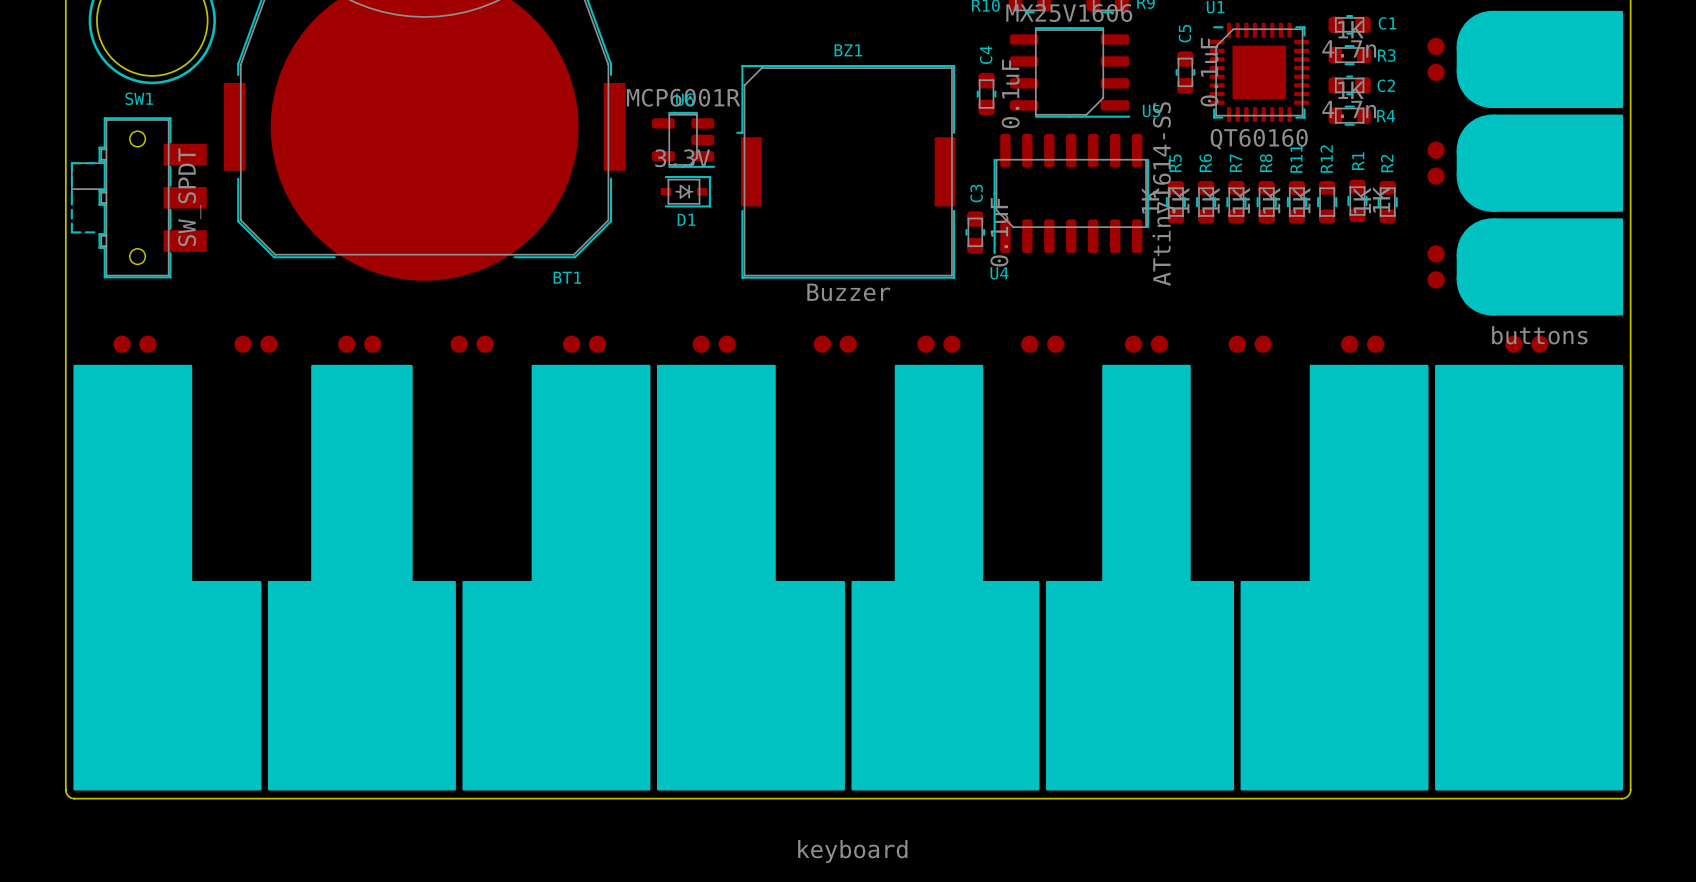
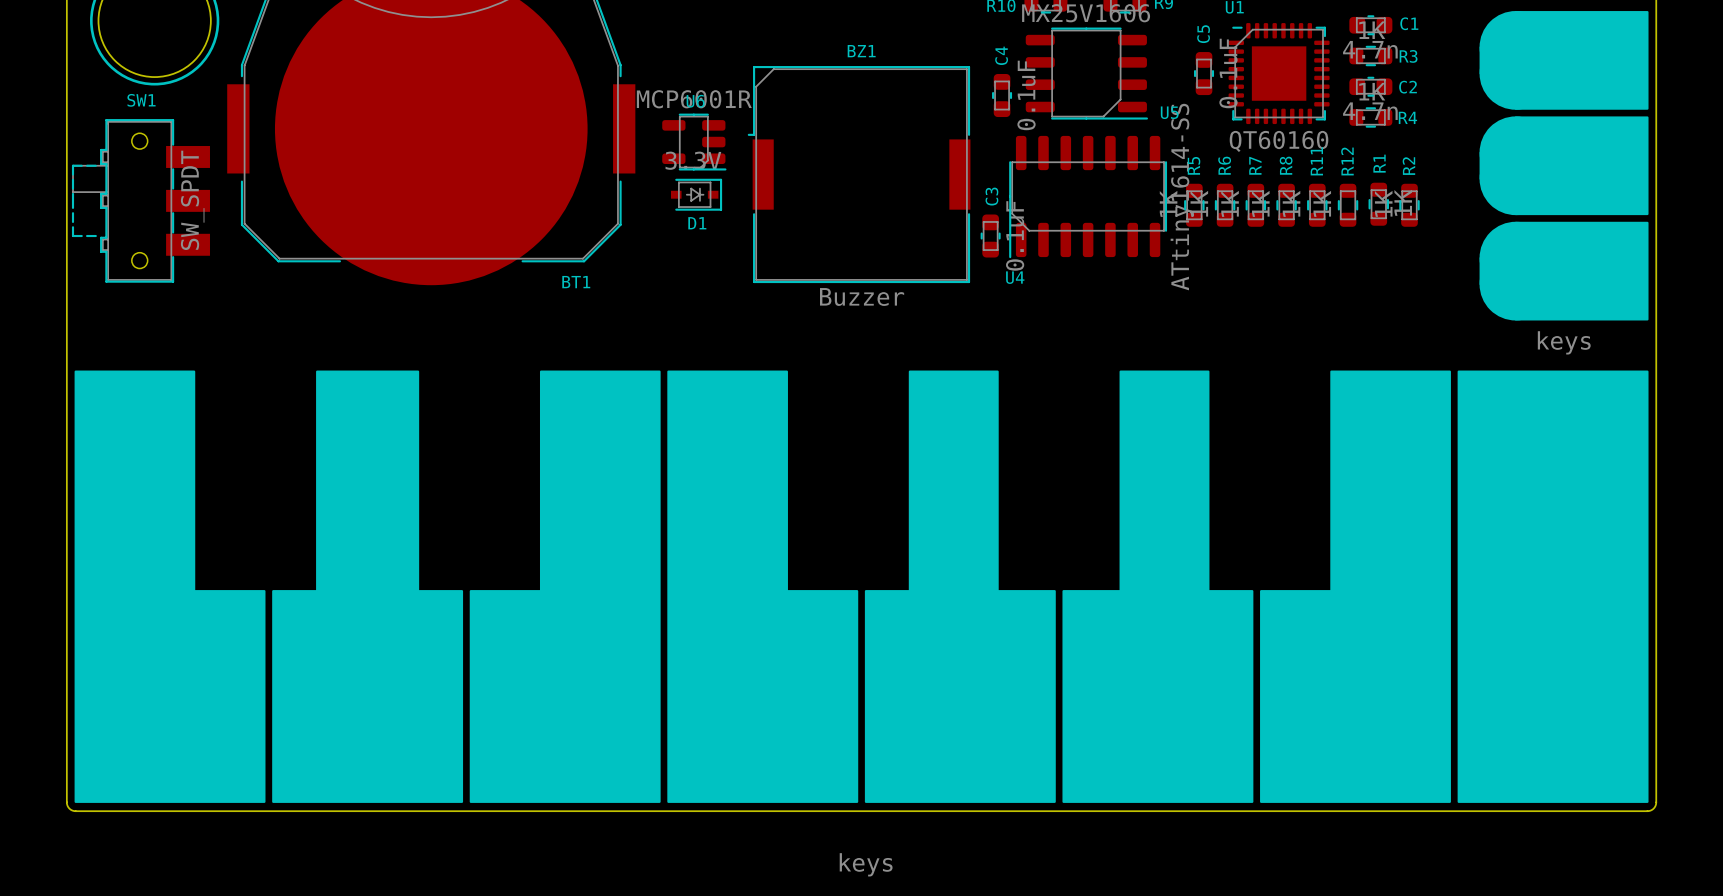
part footprint: [1427, 10, 1624, 316] -> [1479, 11, 1649, 321]
part footprint: [73, 335, 1624, 791] -> [74, 370, 1649, 803]
part value: buttons (1539, 335) -> keys (1564, 342)
part value: keyboard (852, 851) -> keys (866, 864)

